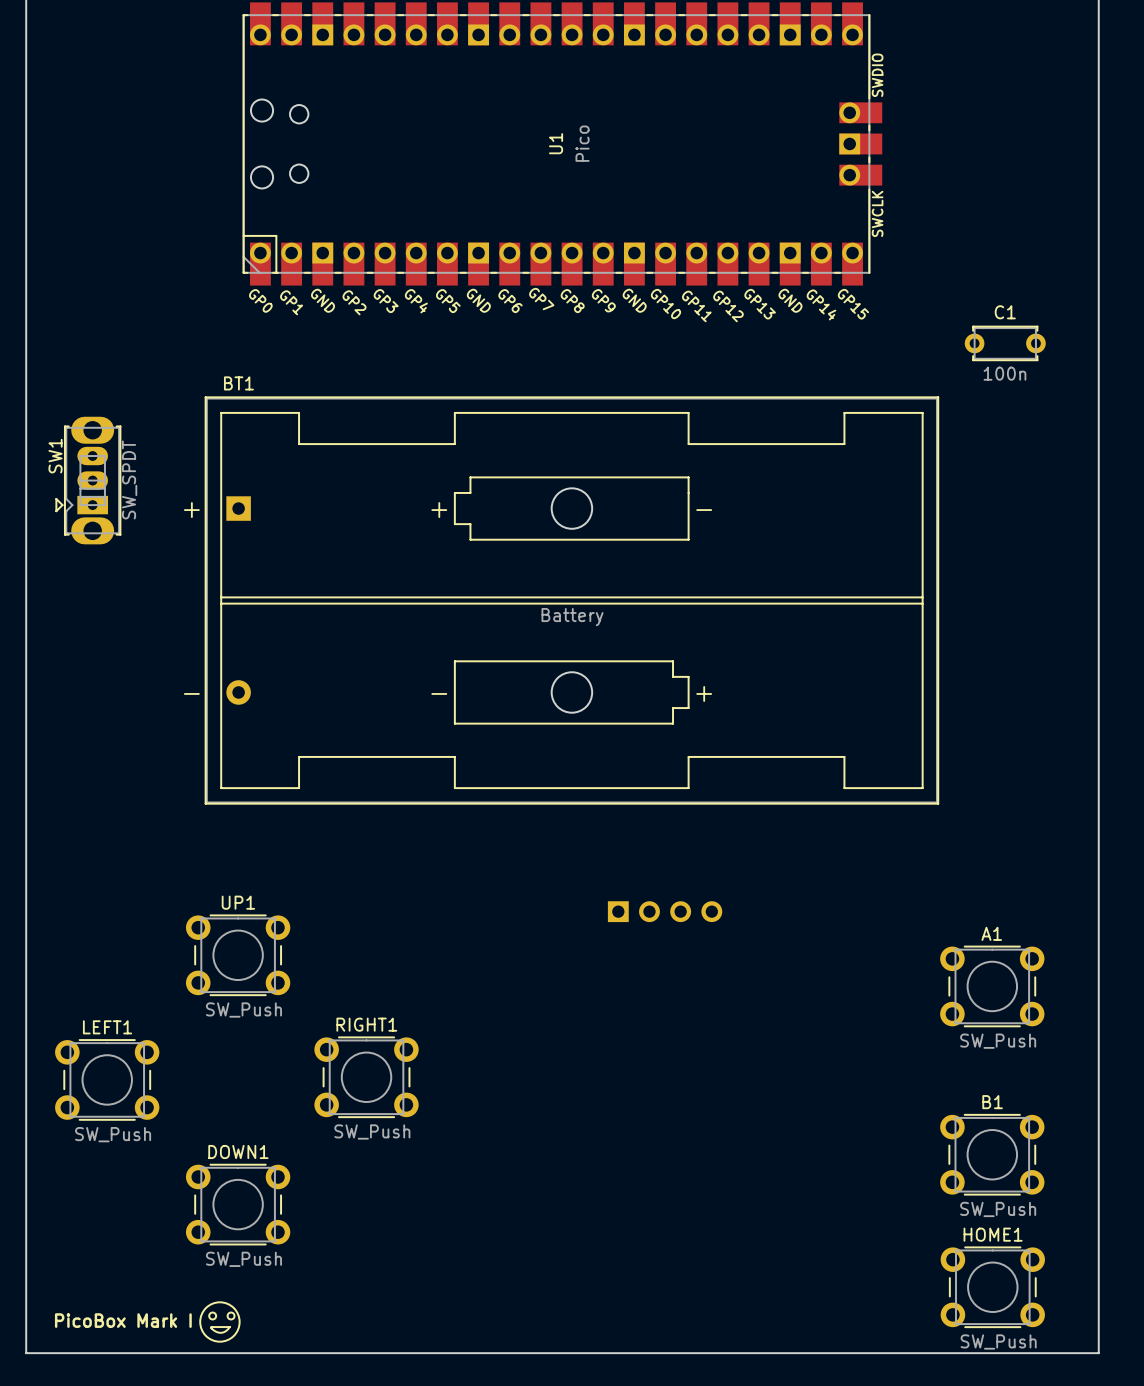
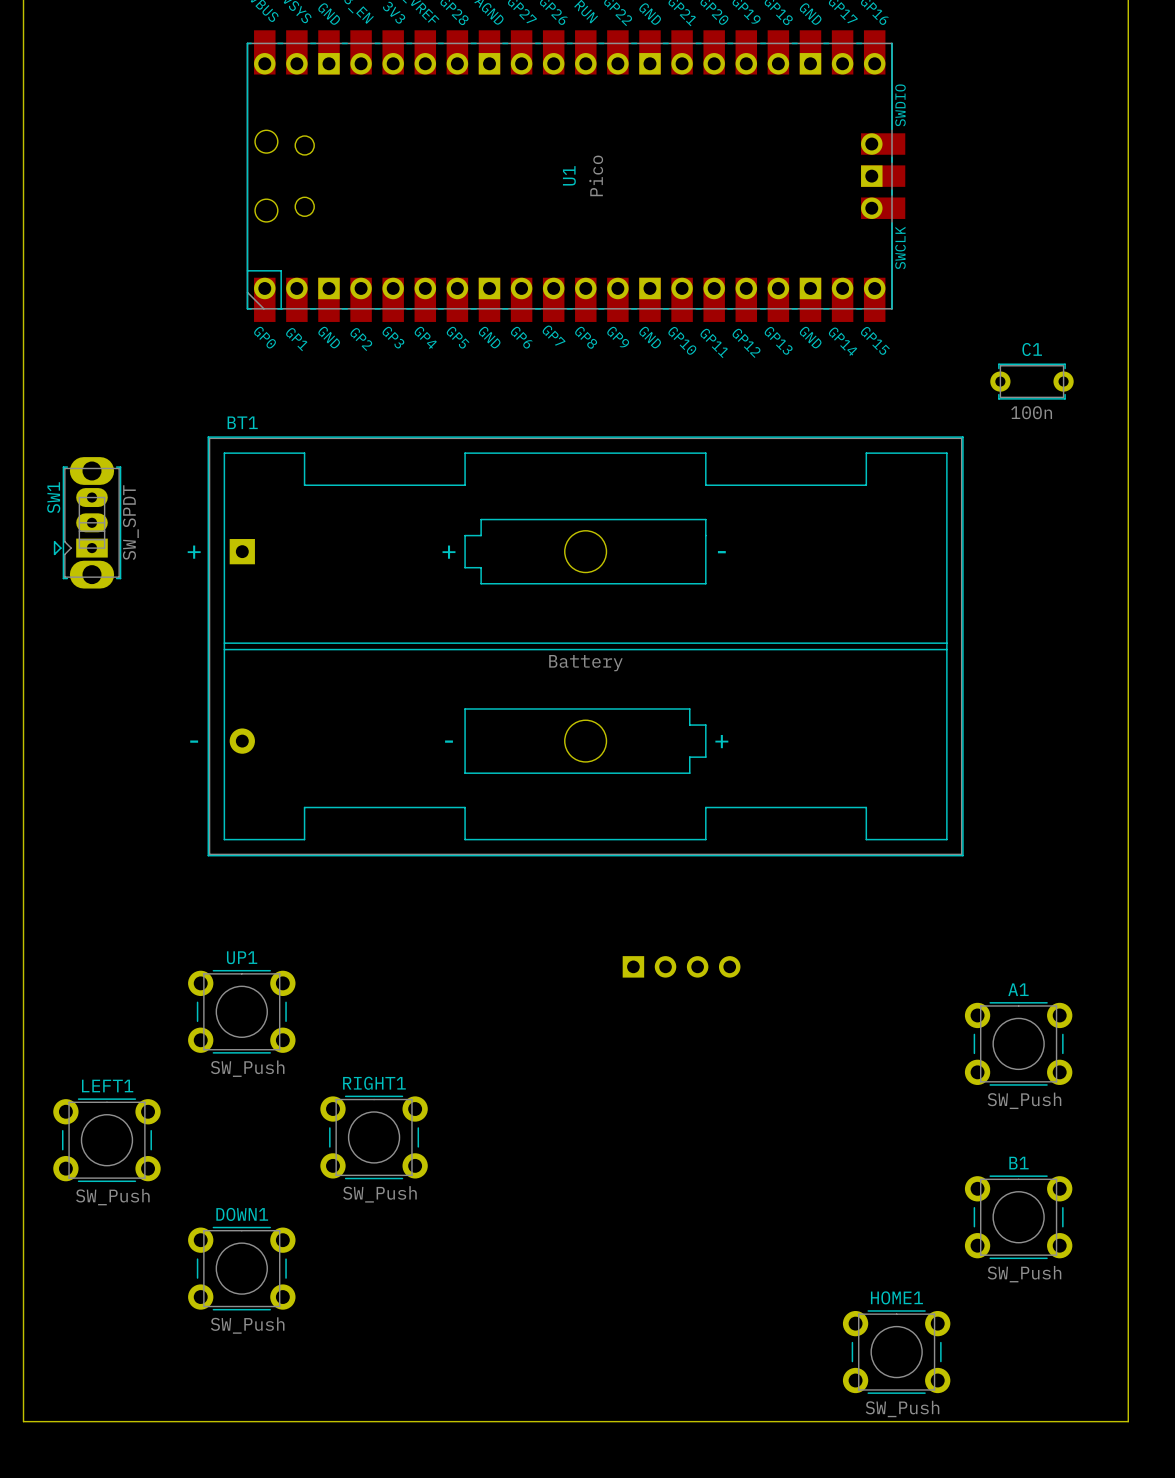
HOME1 position: (992, 1287) -> (896, 1352)
drawing: [199, 1301, 241, 1343] -> none
text: PicoBox Mark I (123, 1320) -> none
line: (211, 1327) (220, 1332) (229, 1327) (211, 1327) -> none

